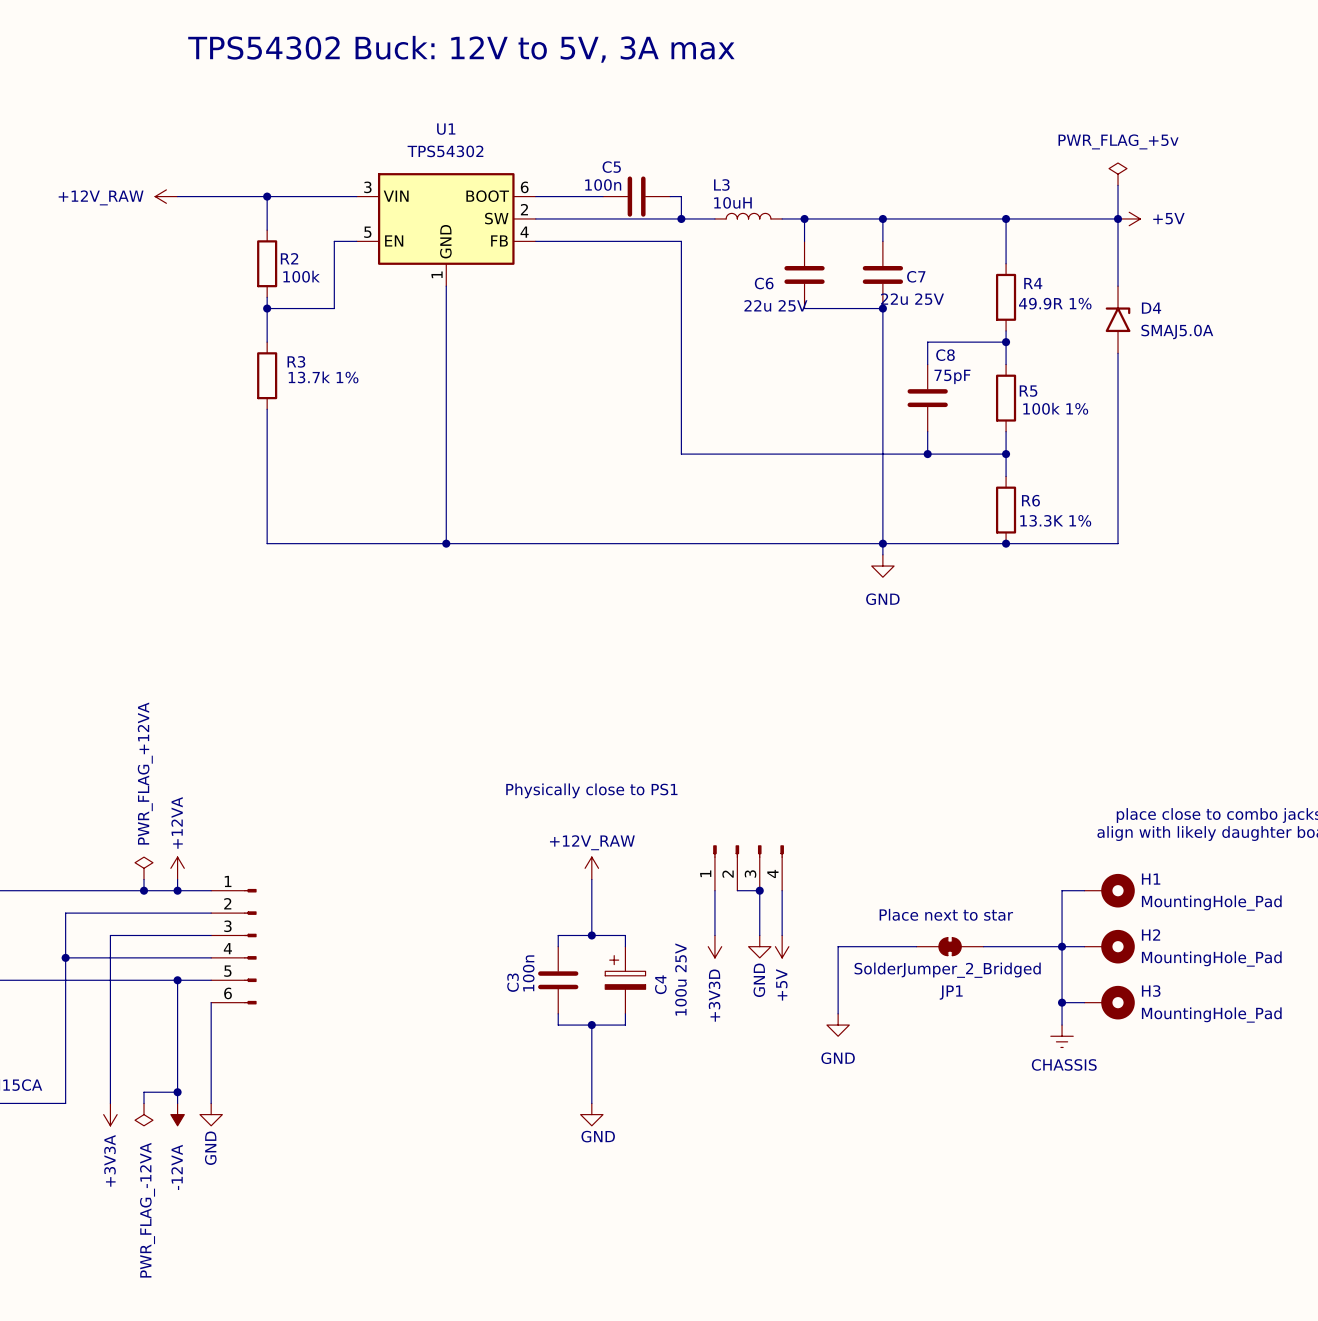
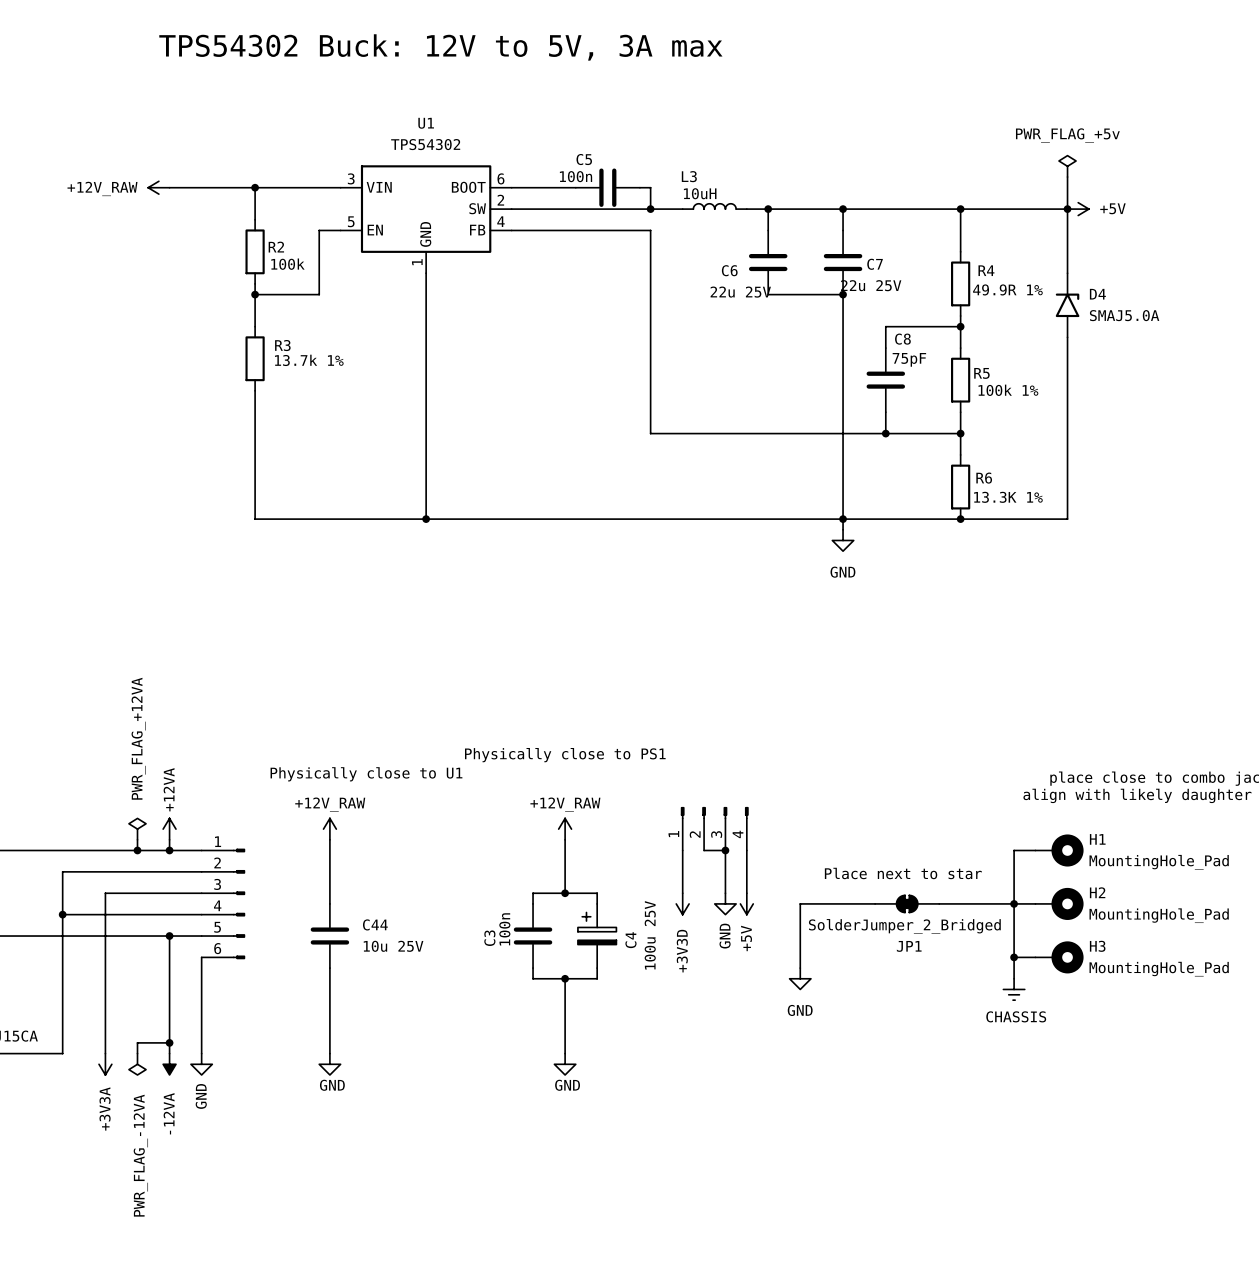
text: none -> Physically close to U1 (366, 774)
power symbol: none -> +12V_RAW (329, 829)
wire: none -> (329, 839) (329, 903)
C44: none -> 10u 25V (329, 936)
wire: none -> (329, 968) (329, 1053)
power symbol: none -> GND (329, 1064)

